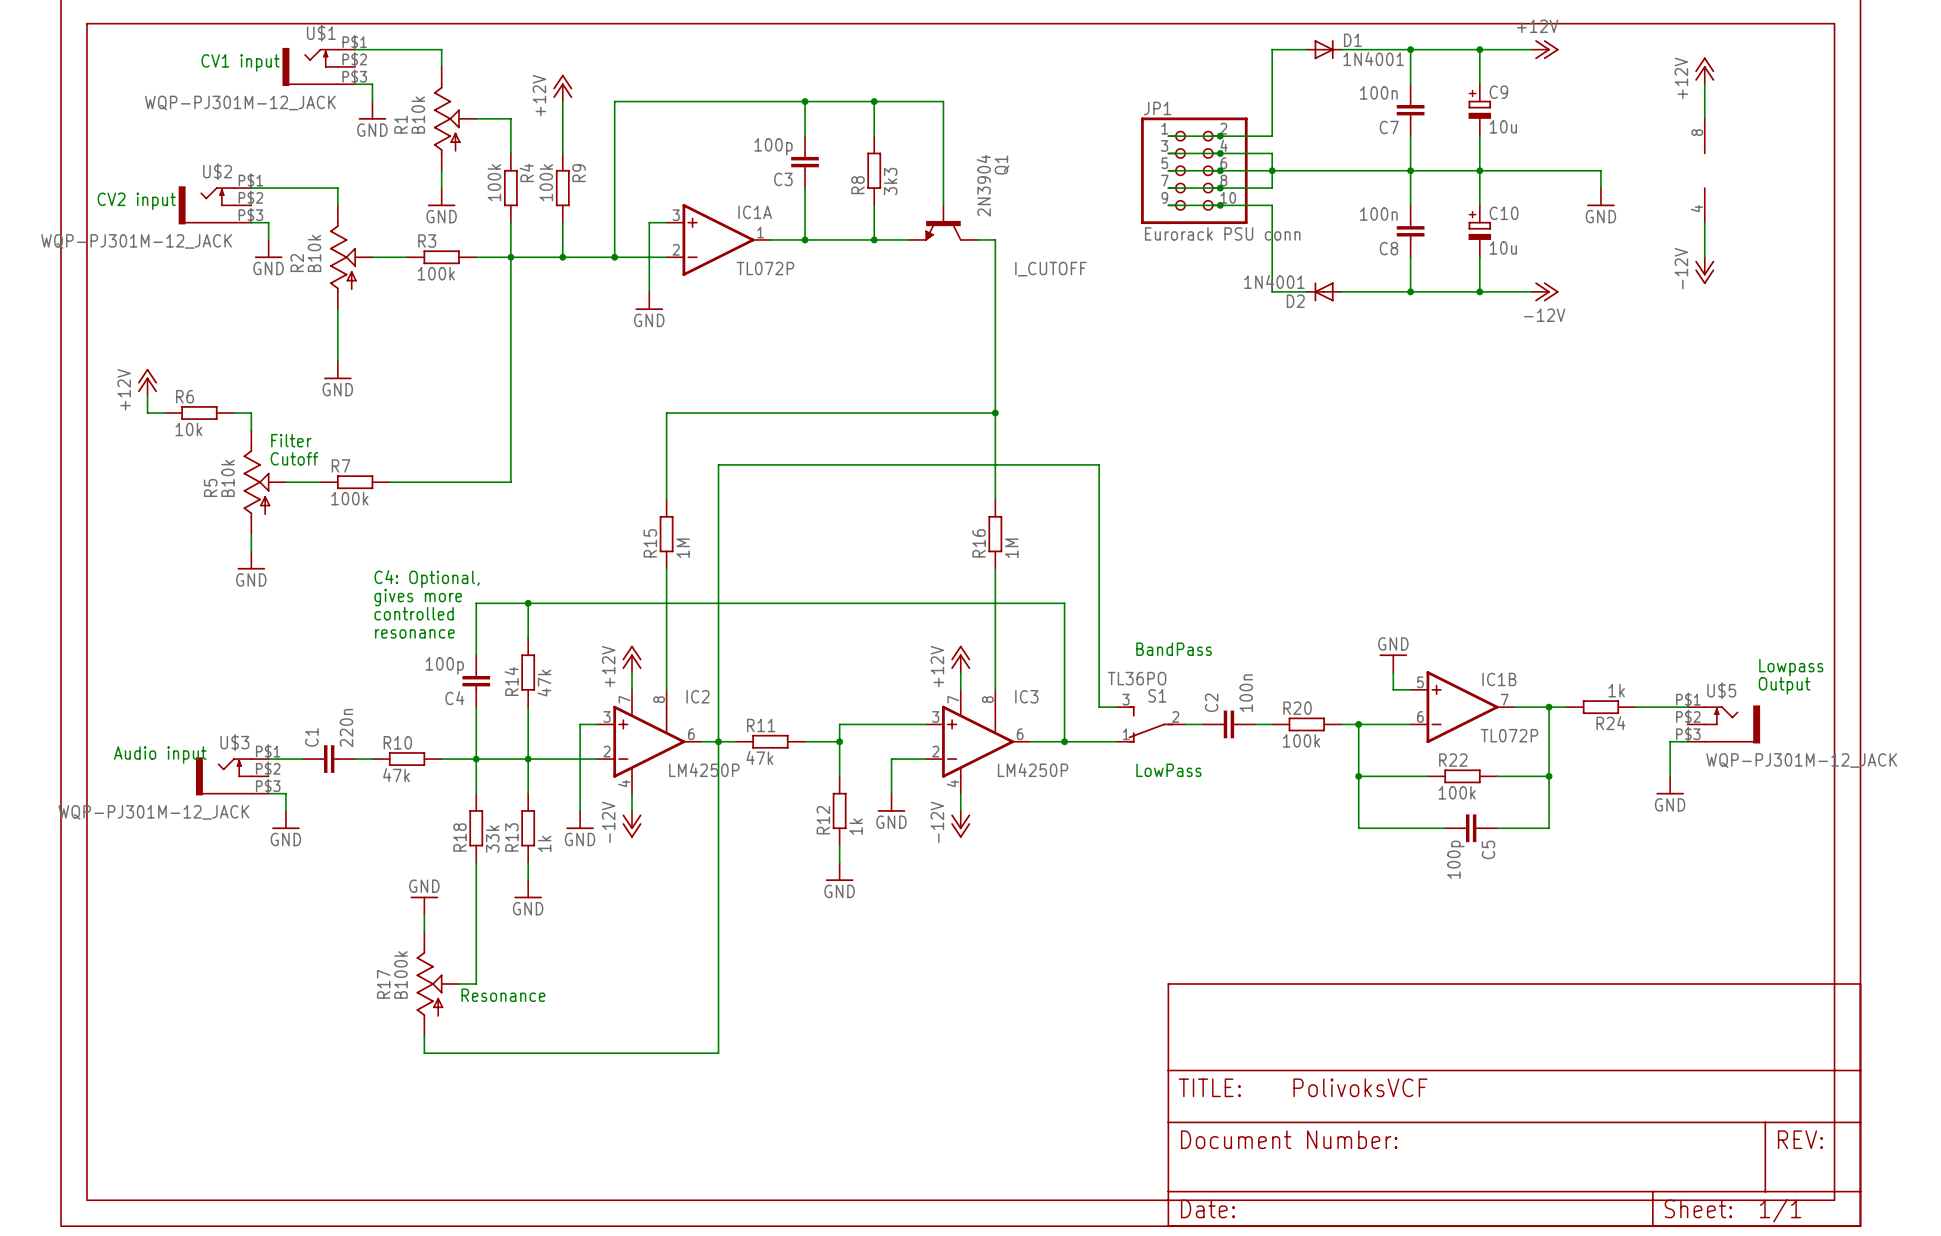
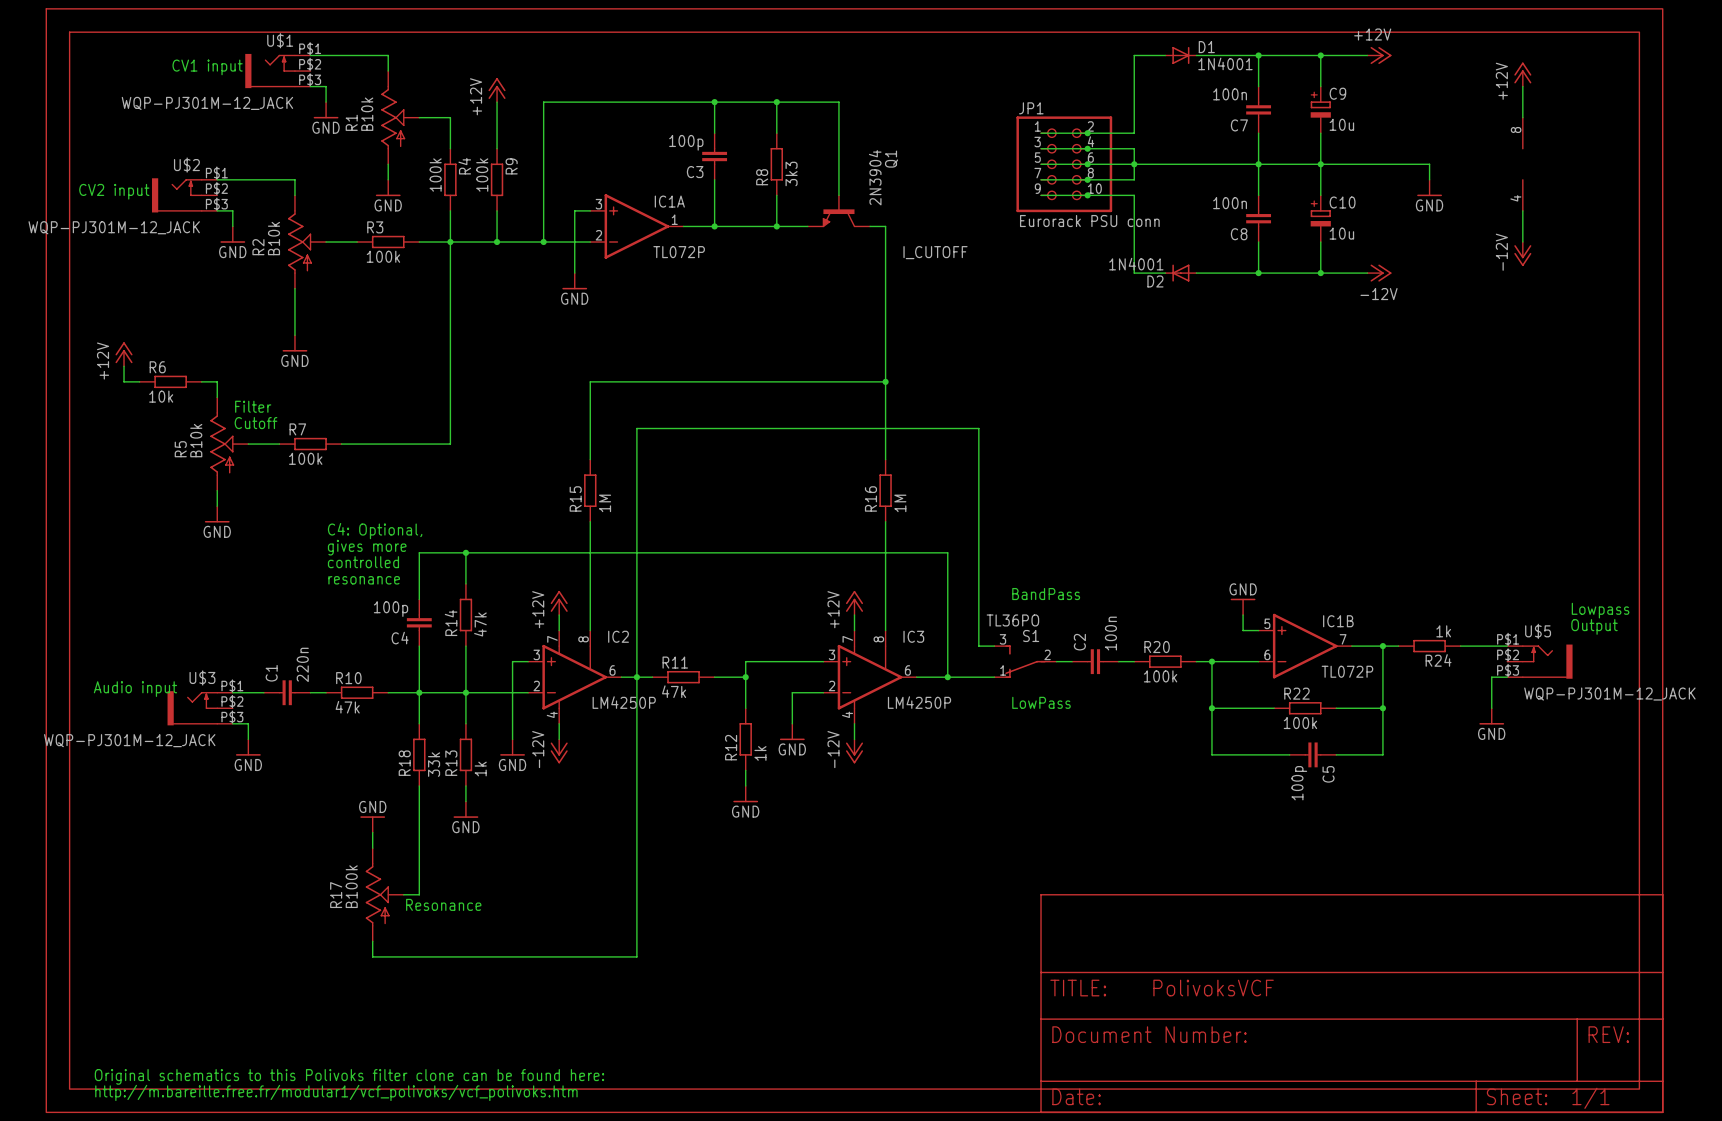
text: none -> Original schematics to this Polivoks filter clone can be found here: (349, 1076)
text: none -> http://m.bareille.free.fr/modular1/vcf_polivoks/vcf_polivoks.htm (336, 1092)

